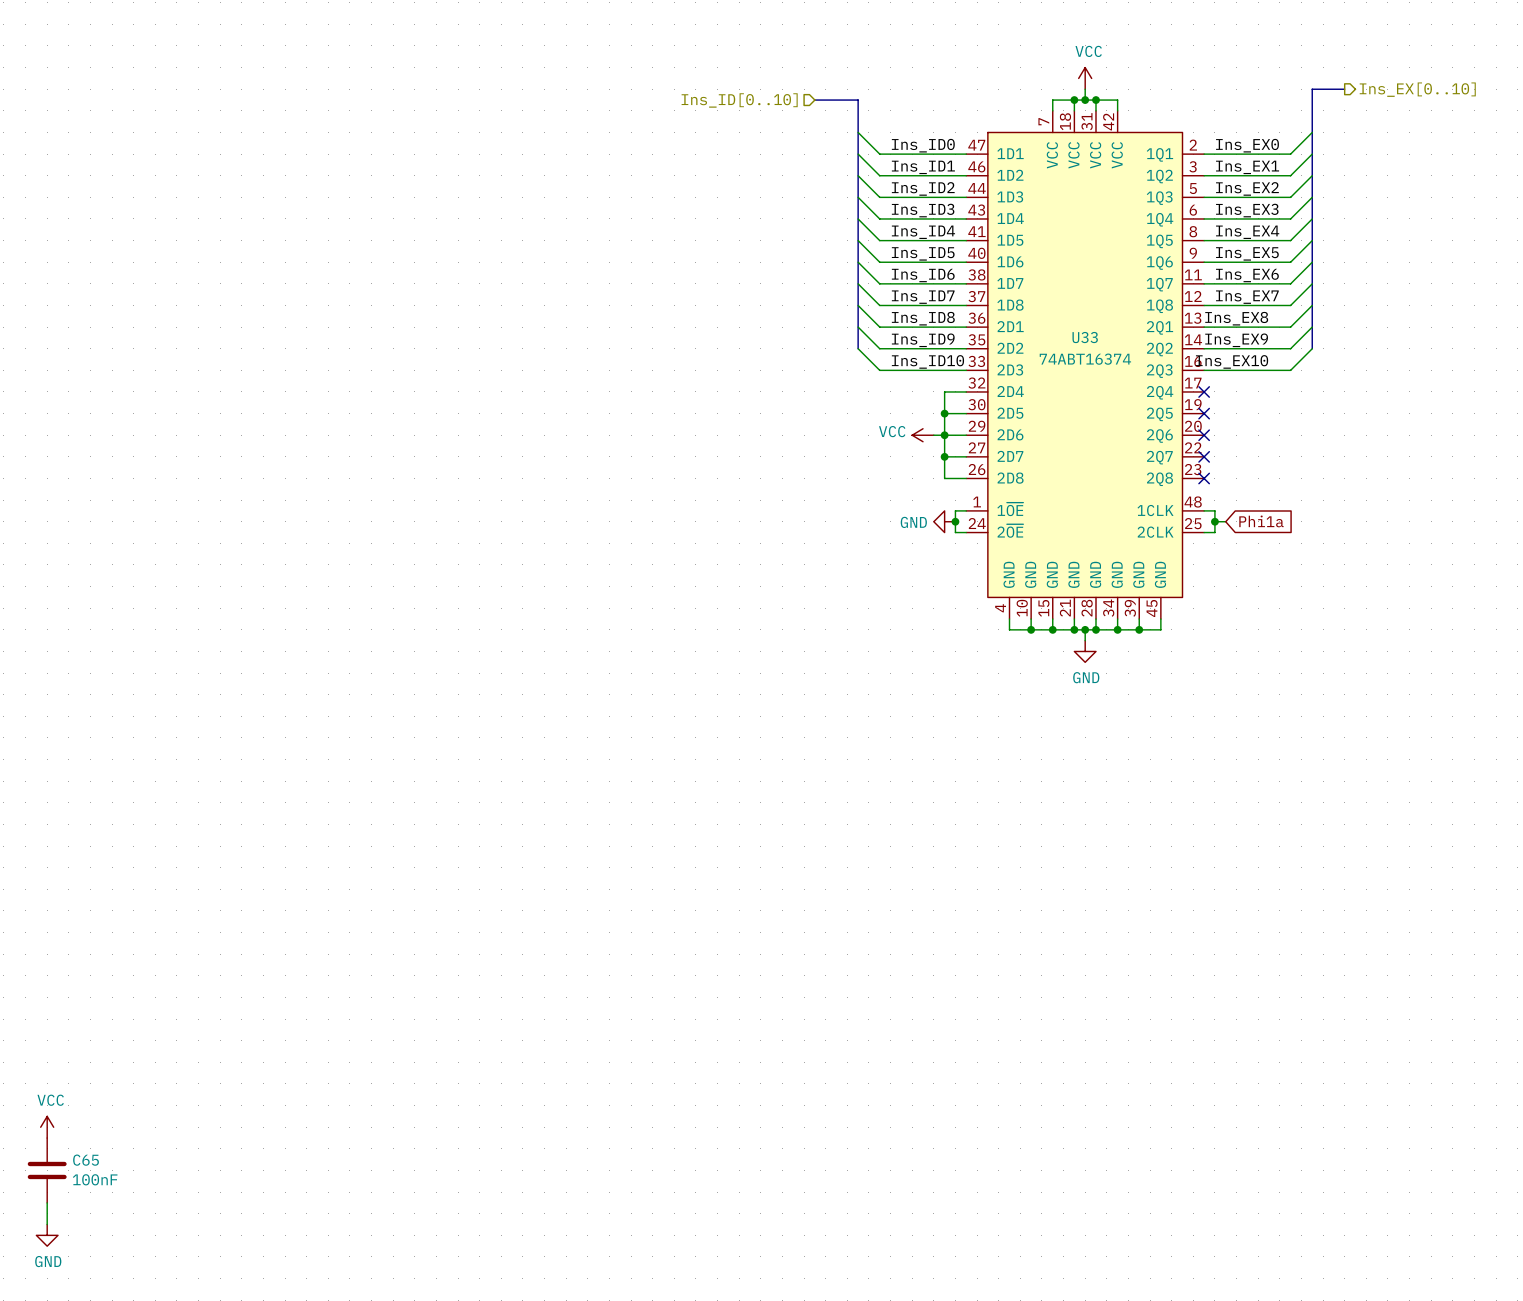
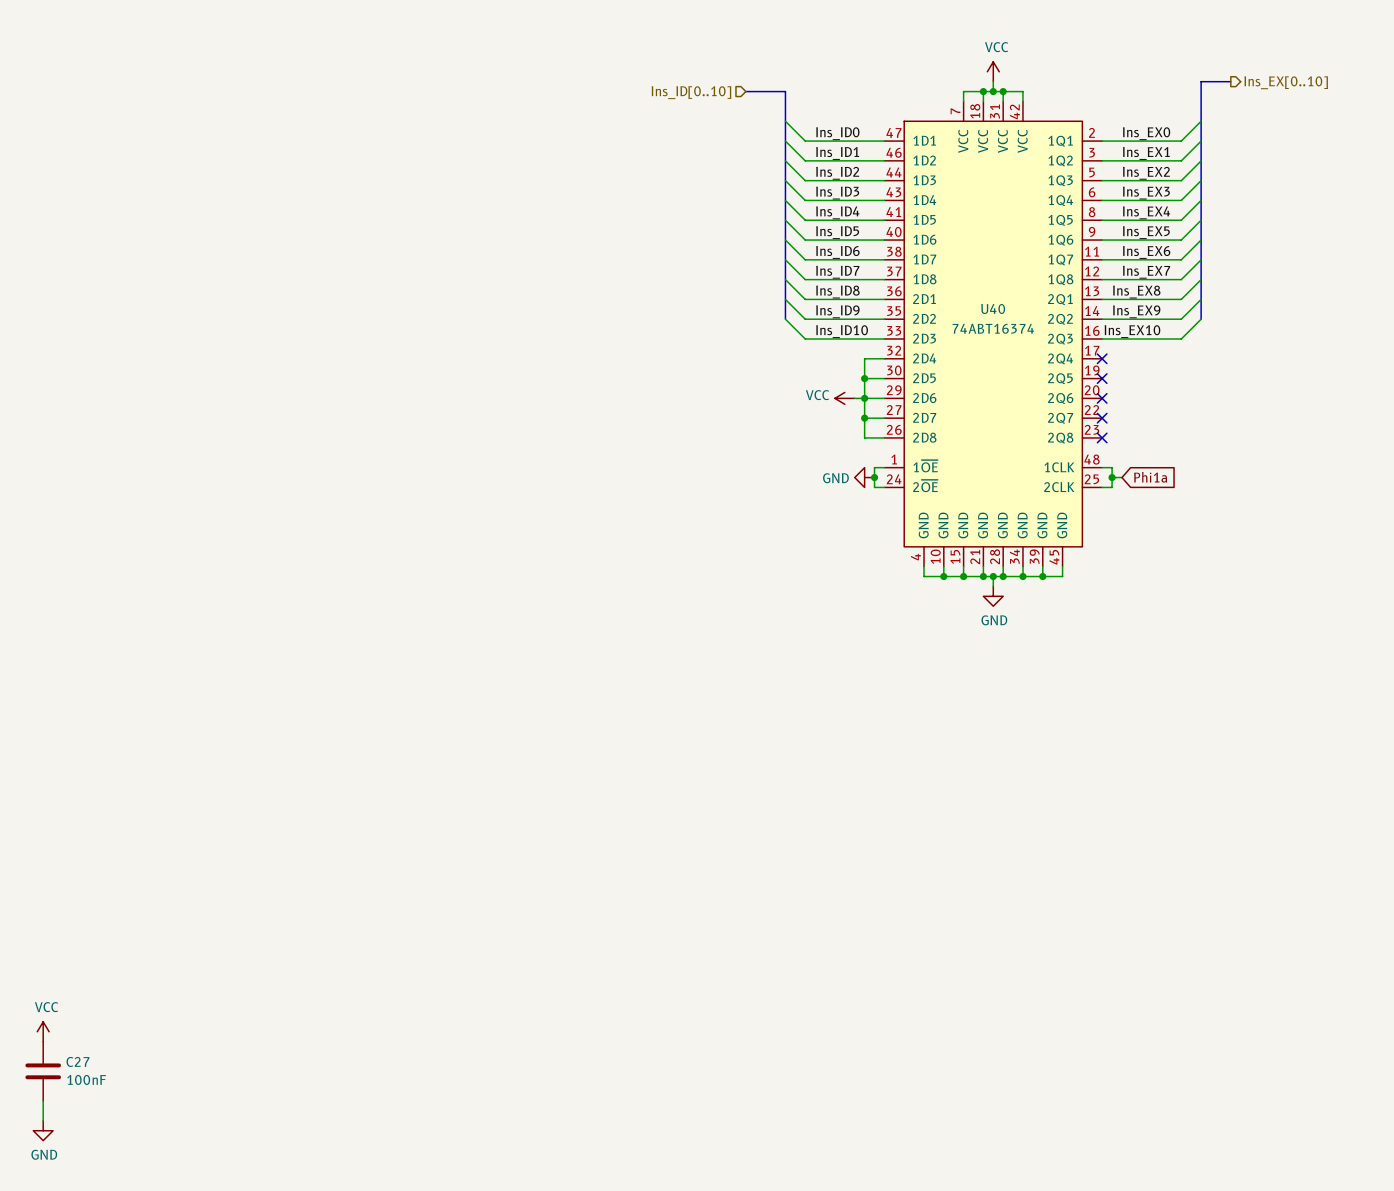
U33 name: U33 (1085, 337) -> U40 (993, 308)
C65 name: C65 (86, 1160) -> C27 (77, 1061)

